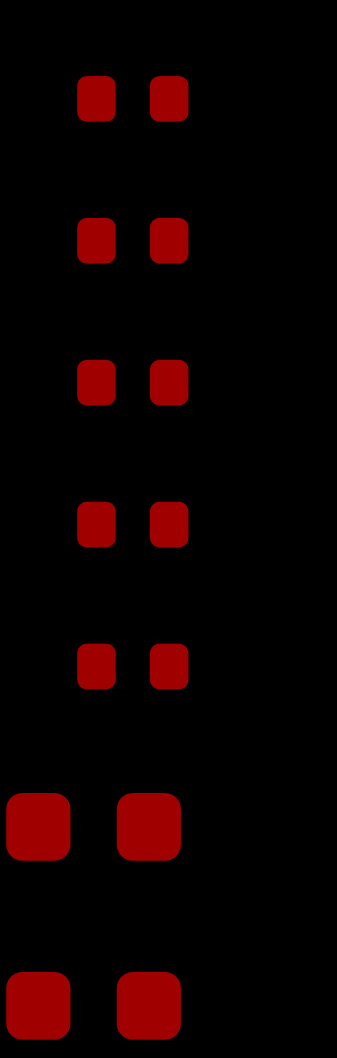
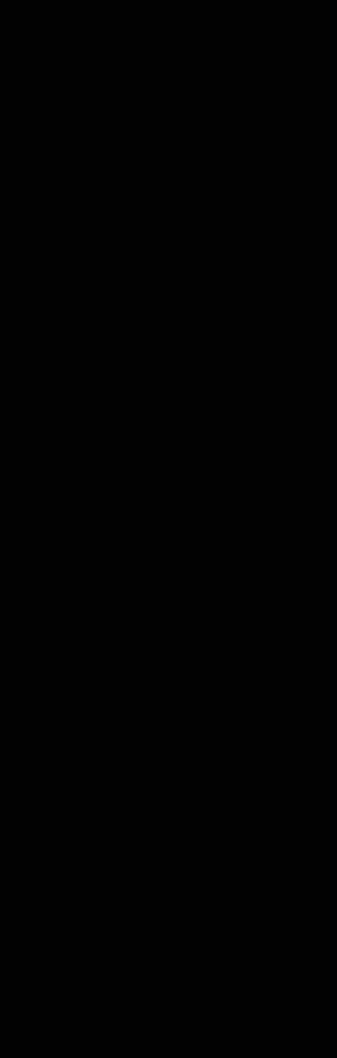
part: (132, 98) -> none
part: (132, 240) -> none
part: (132, 382) -> none
part: (132, 524) -> none
part: (132, 666) -> none
part: (93, 826) -> none
part: (93, 1005) -> none

